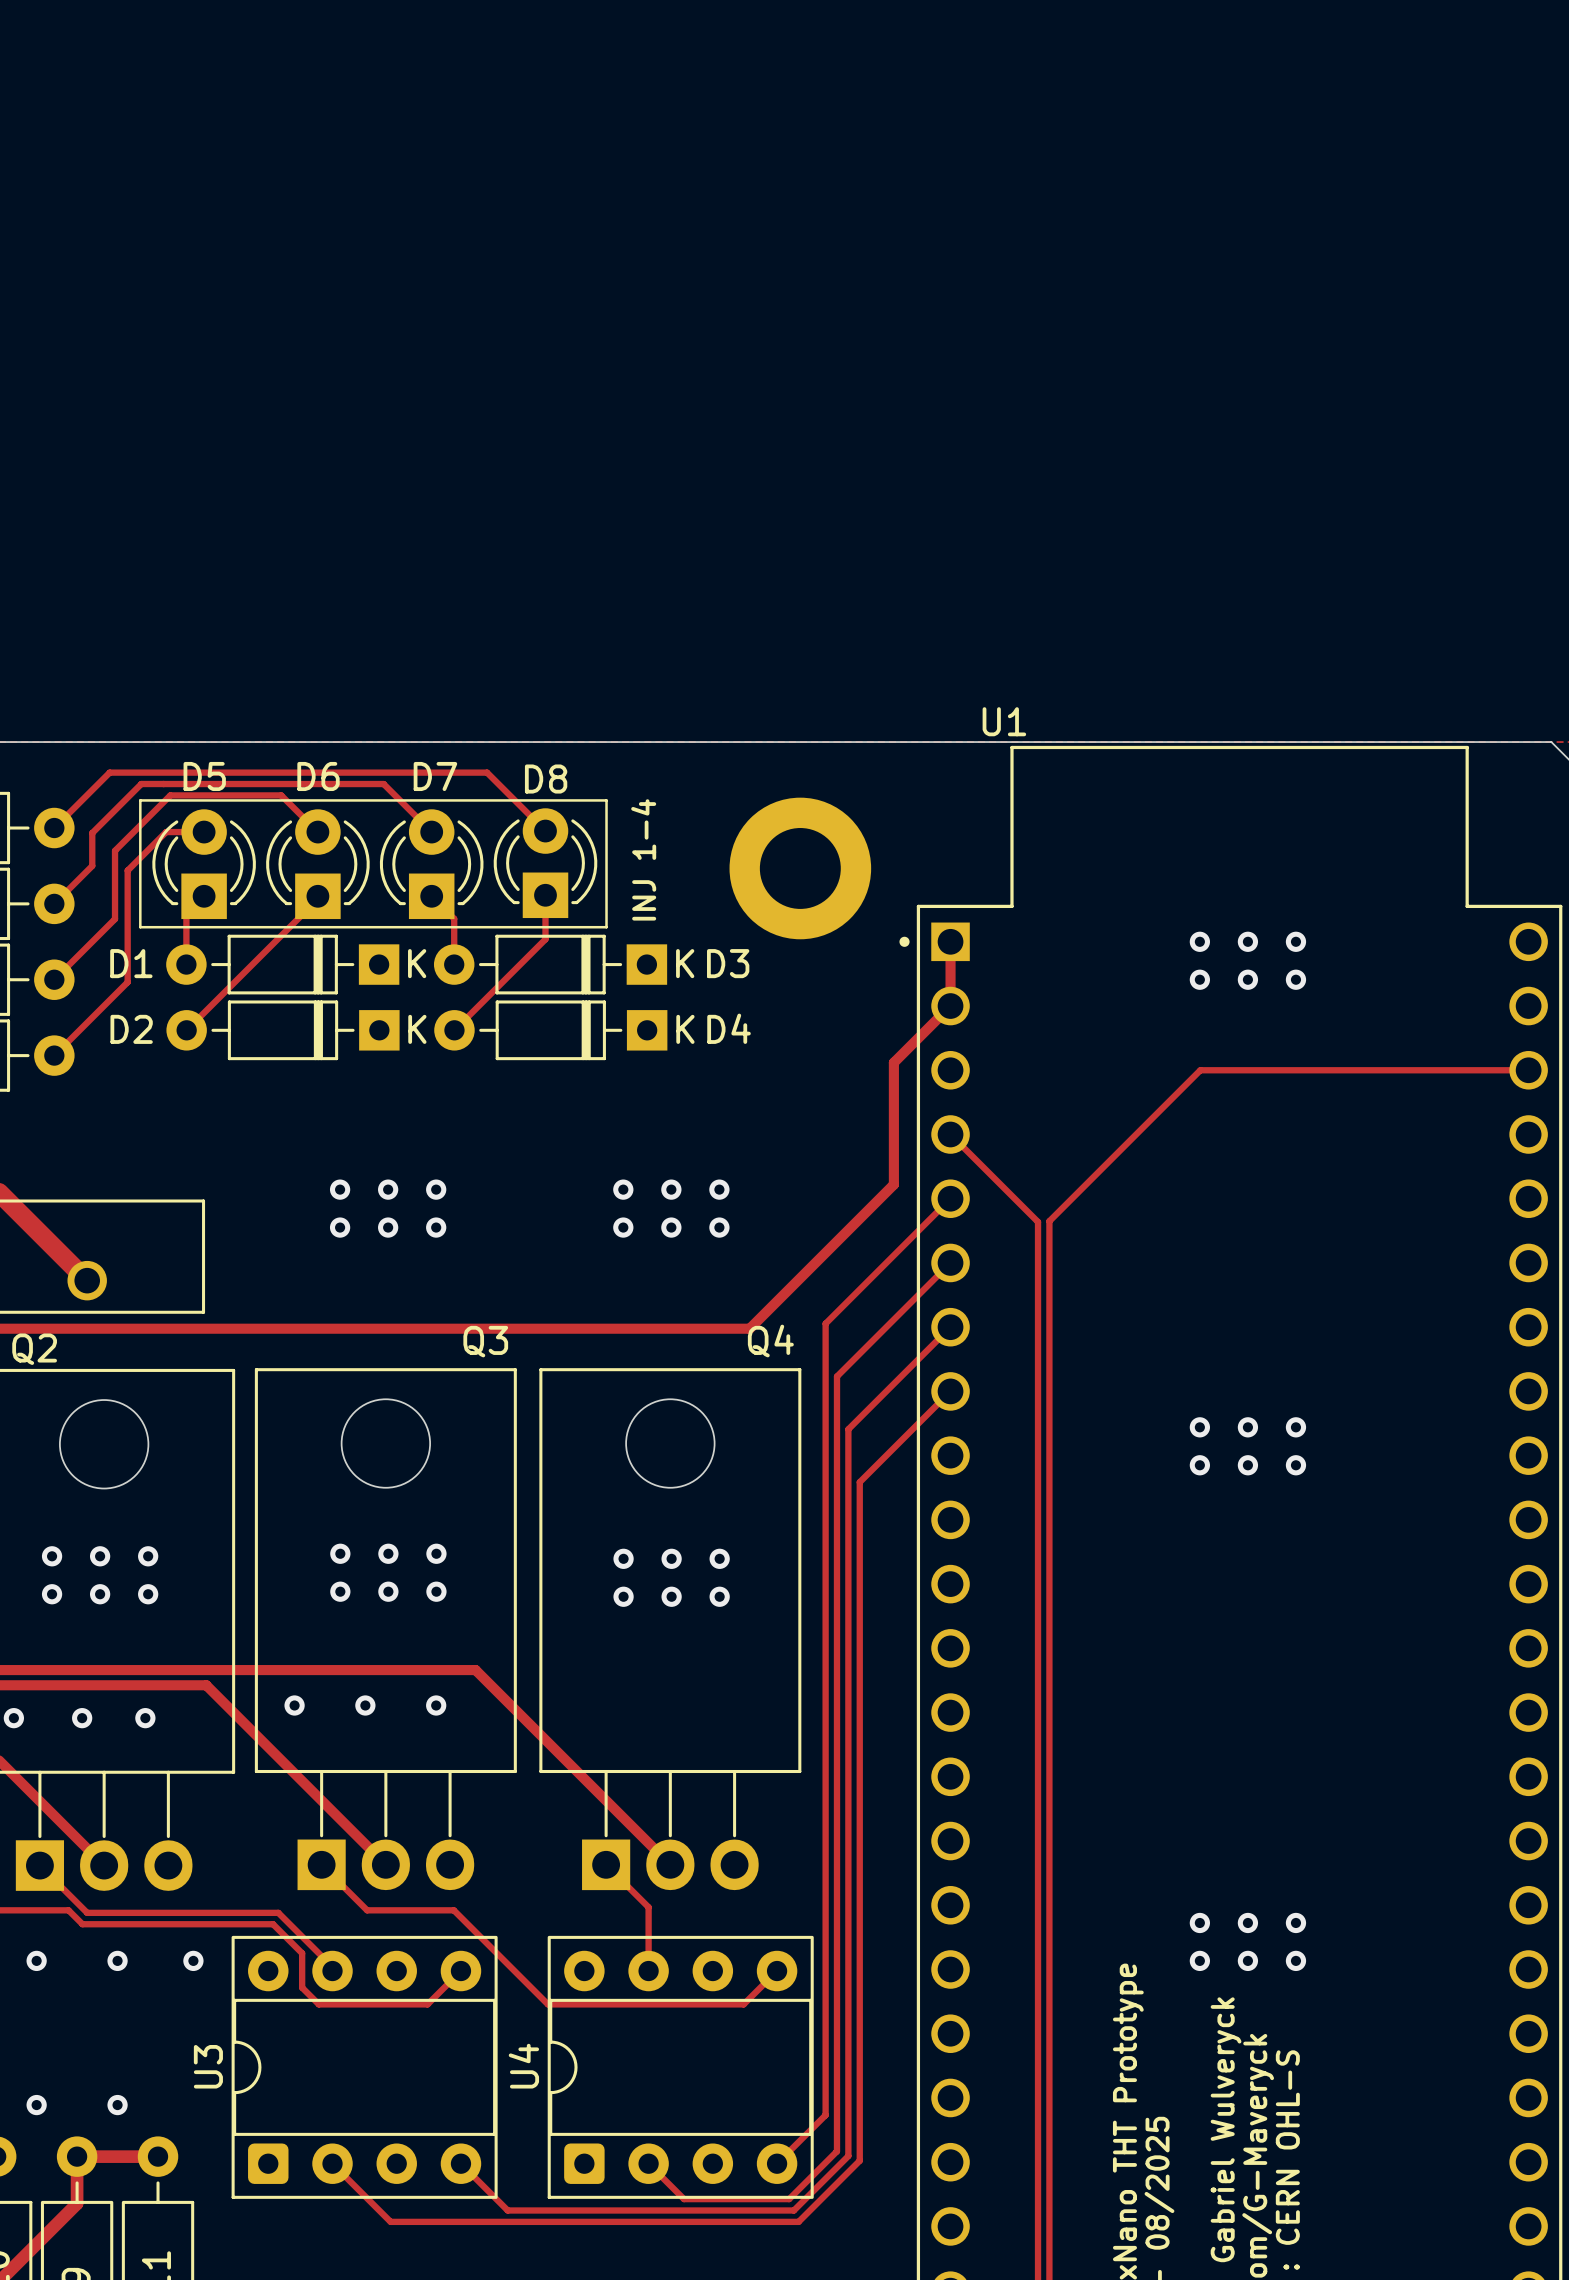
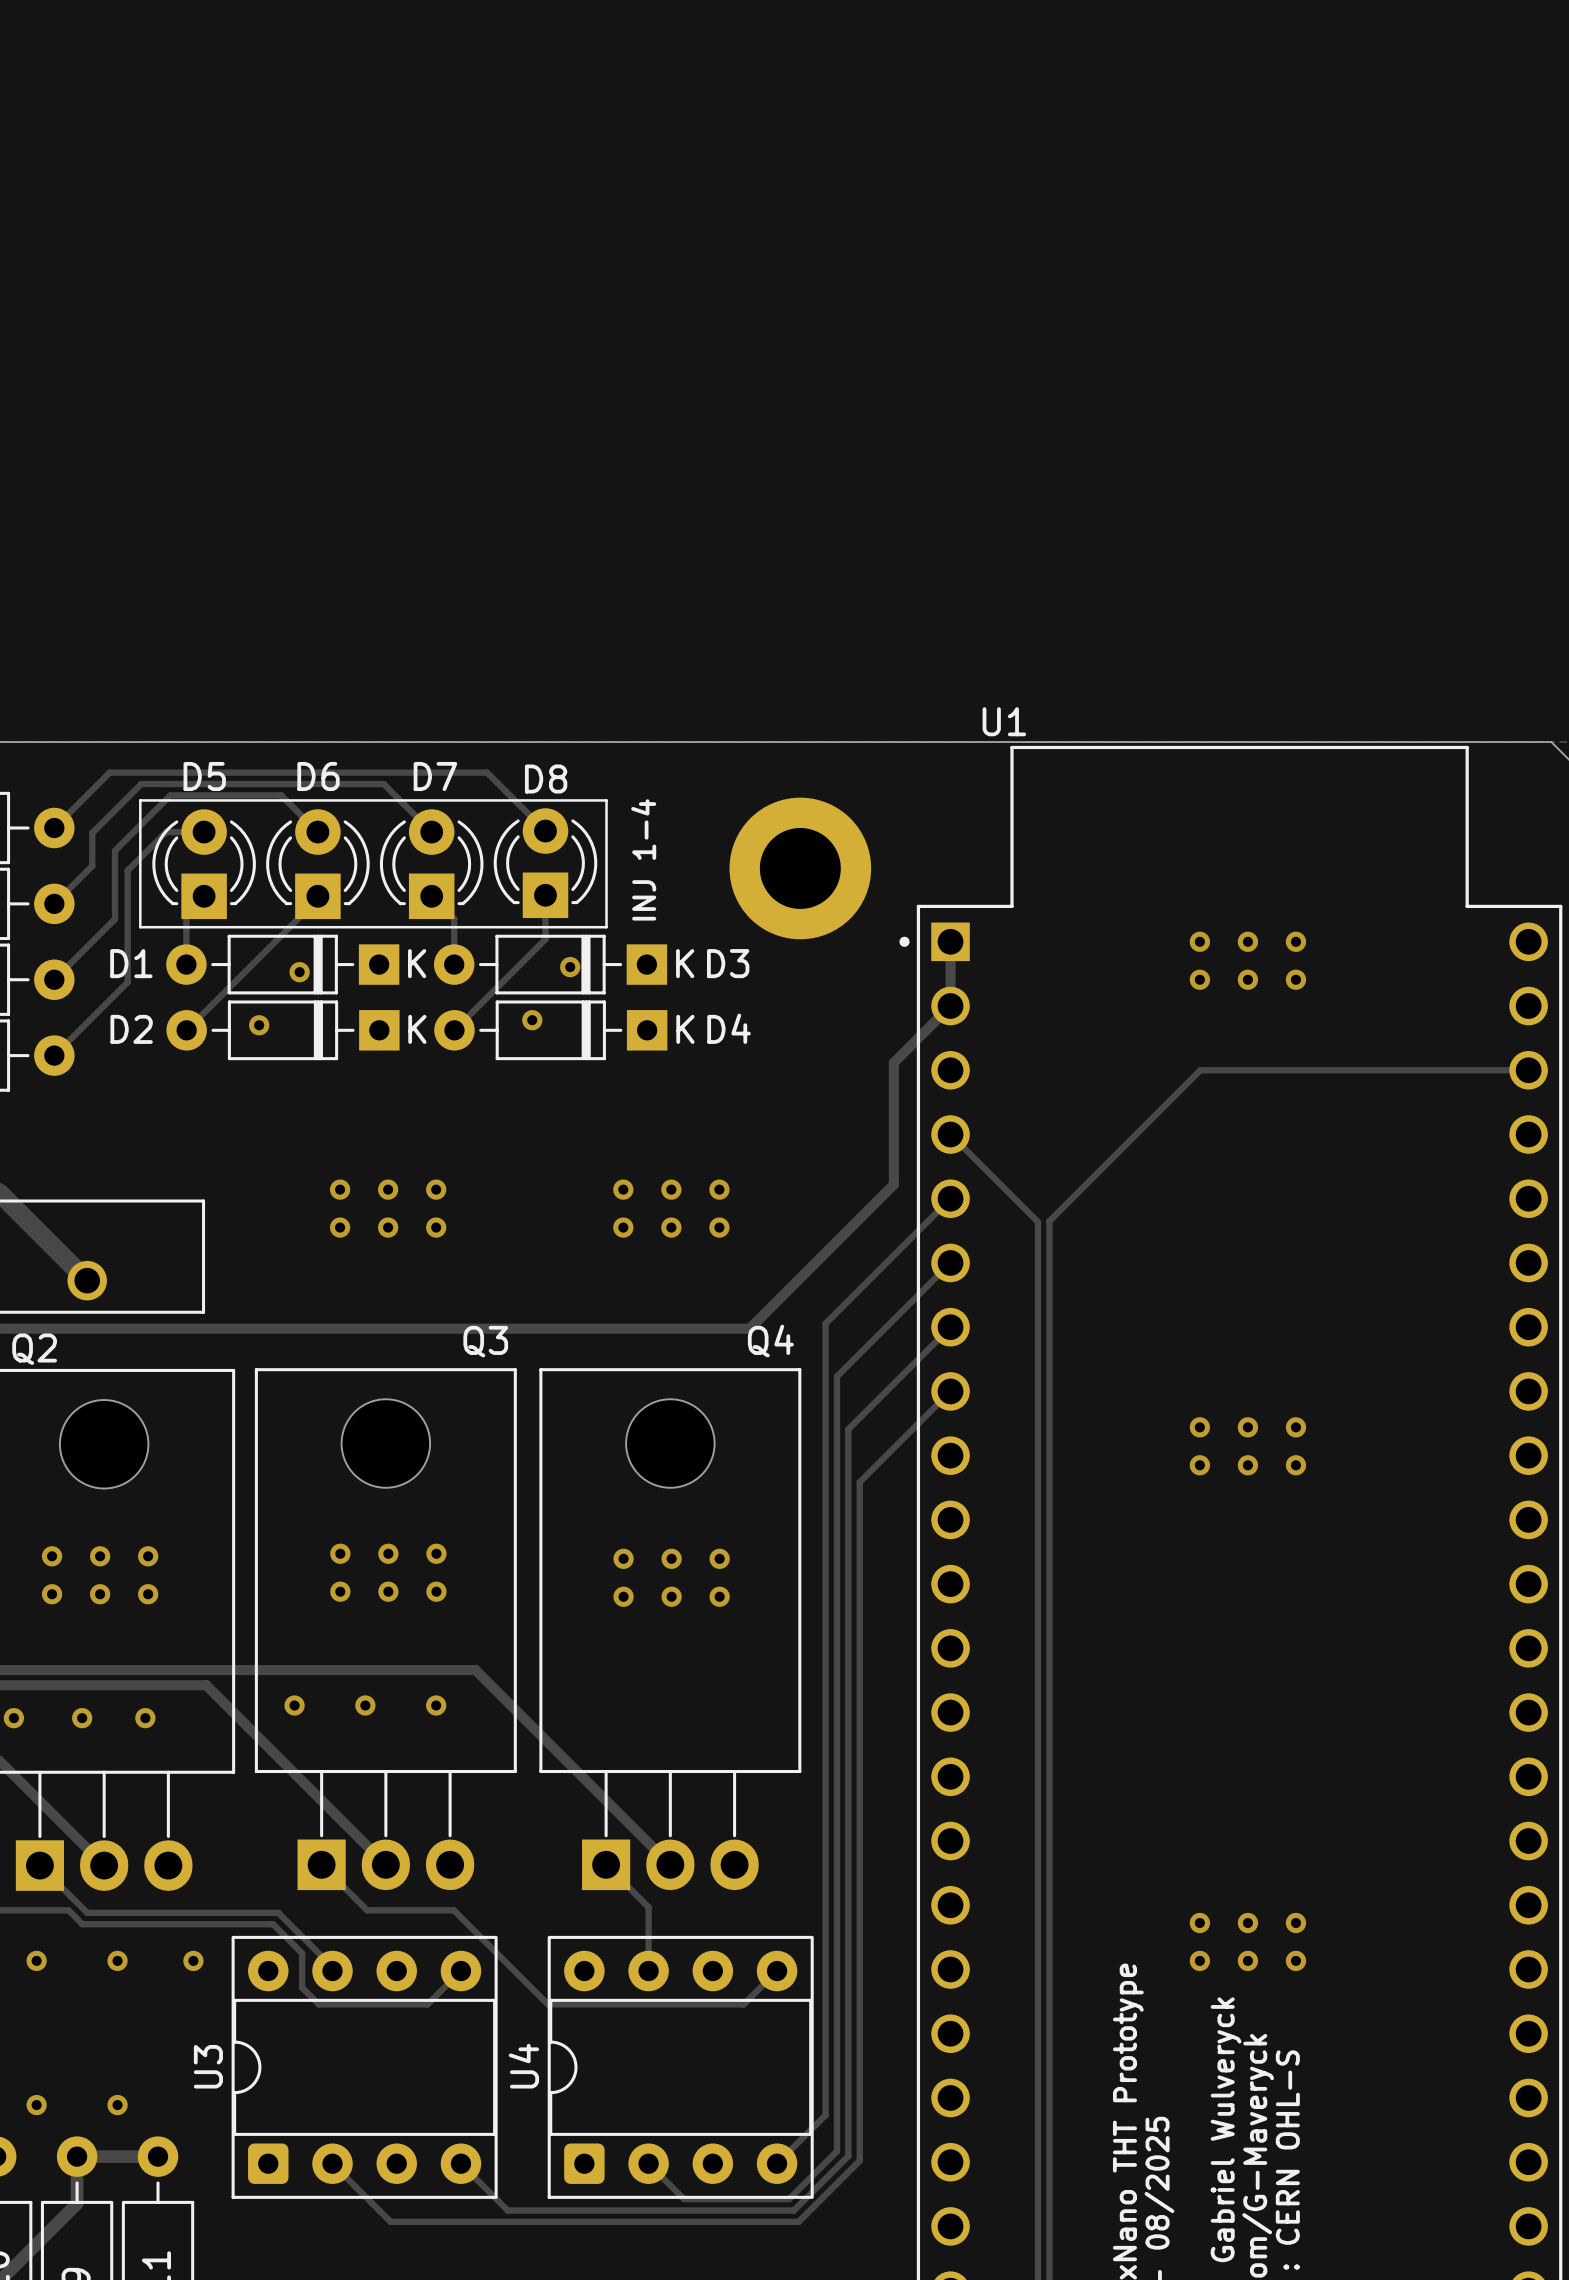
via: none -> (570, 967)
via: none -> (299, 972)
via: none -> (532, 1020)
via: none -> (259, 1025)

